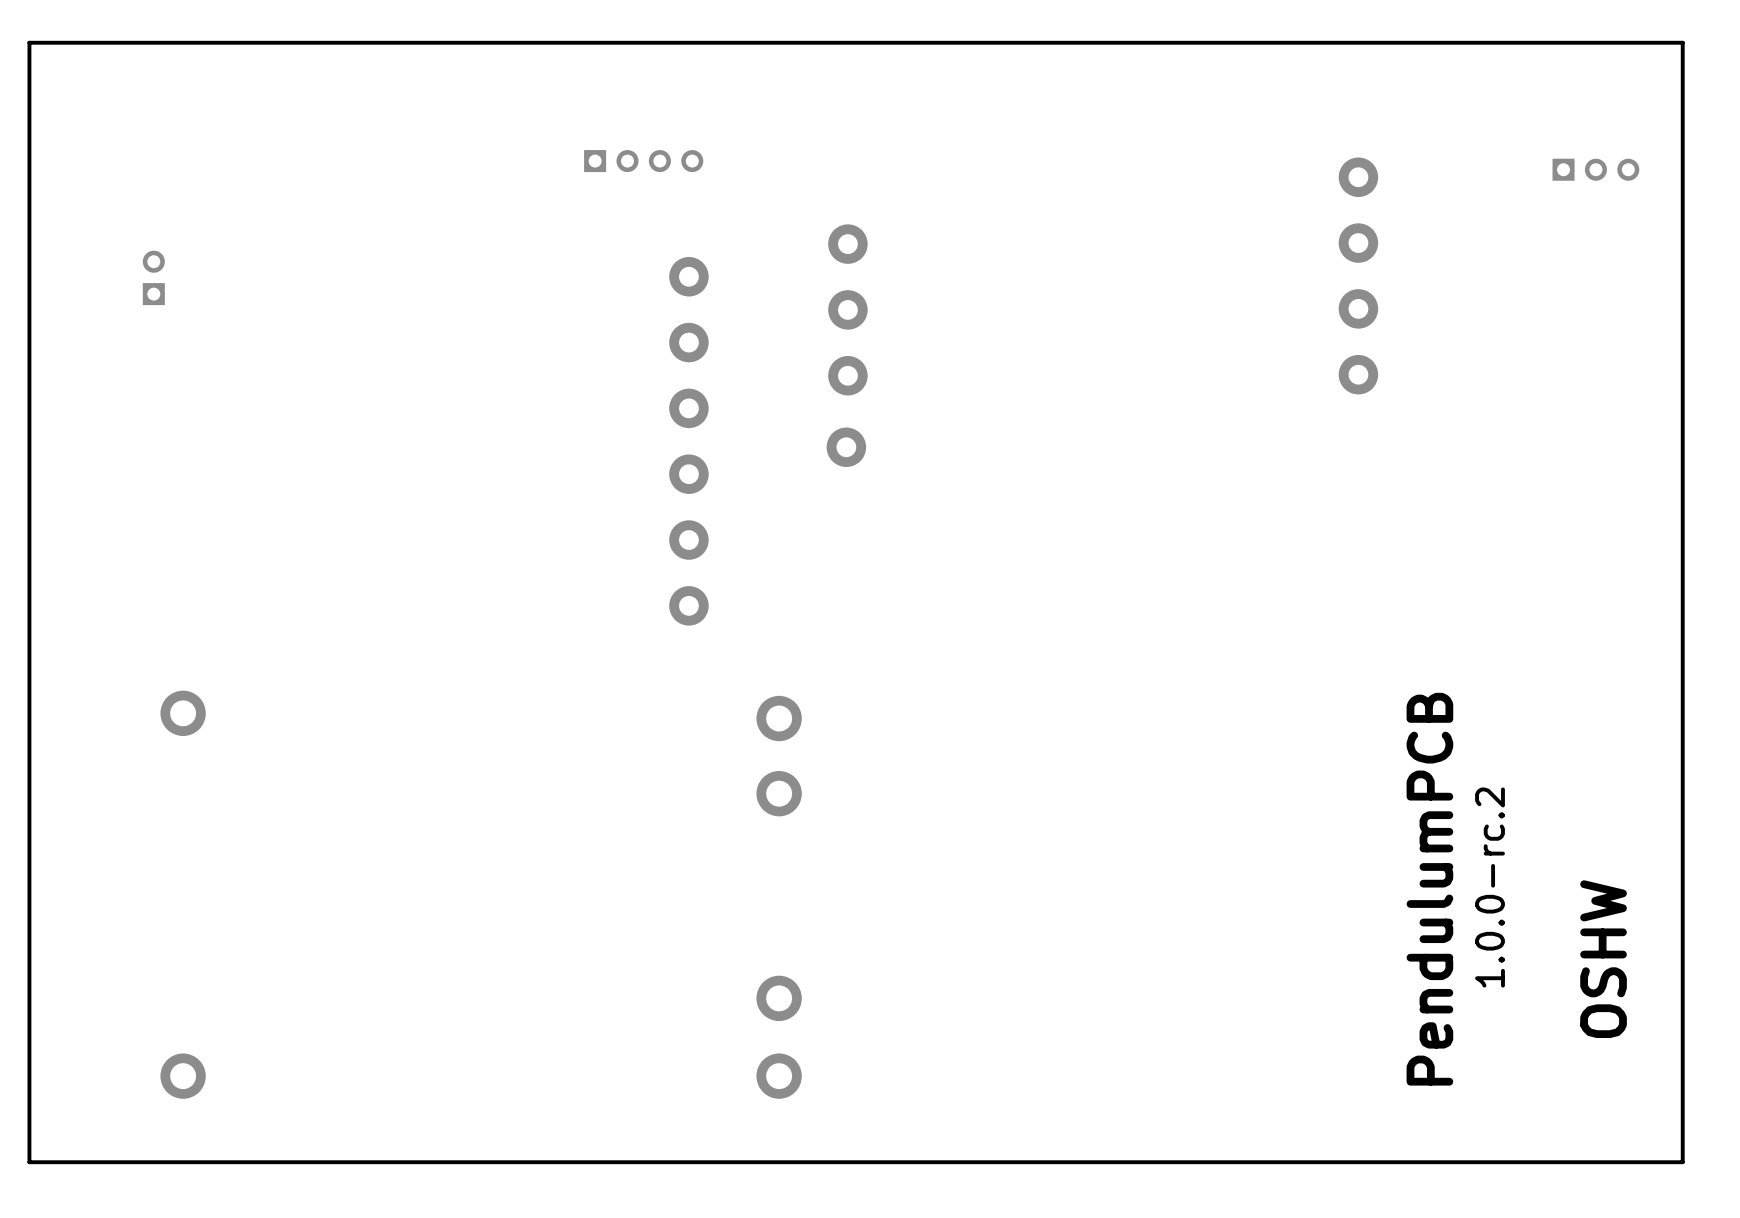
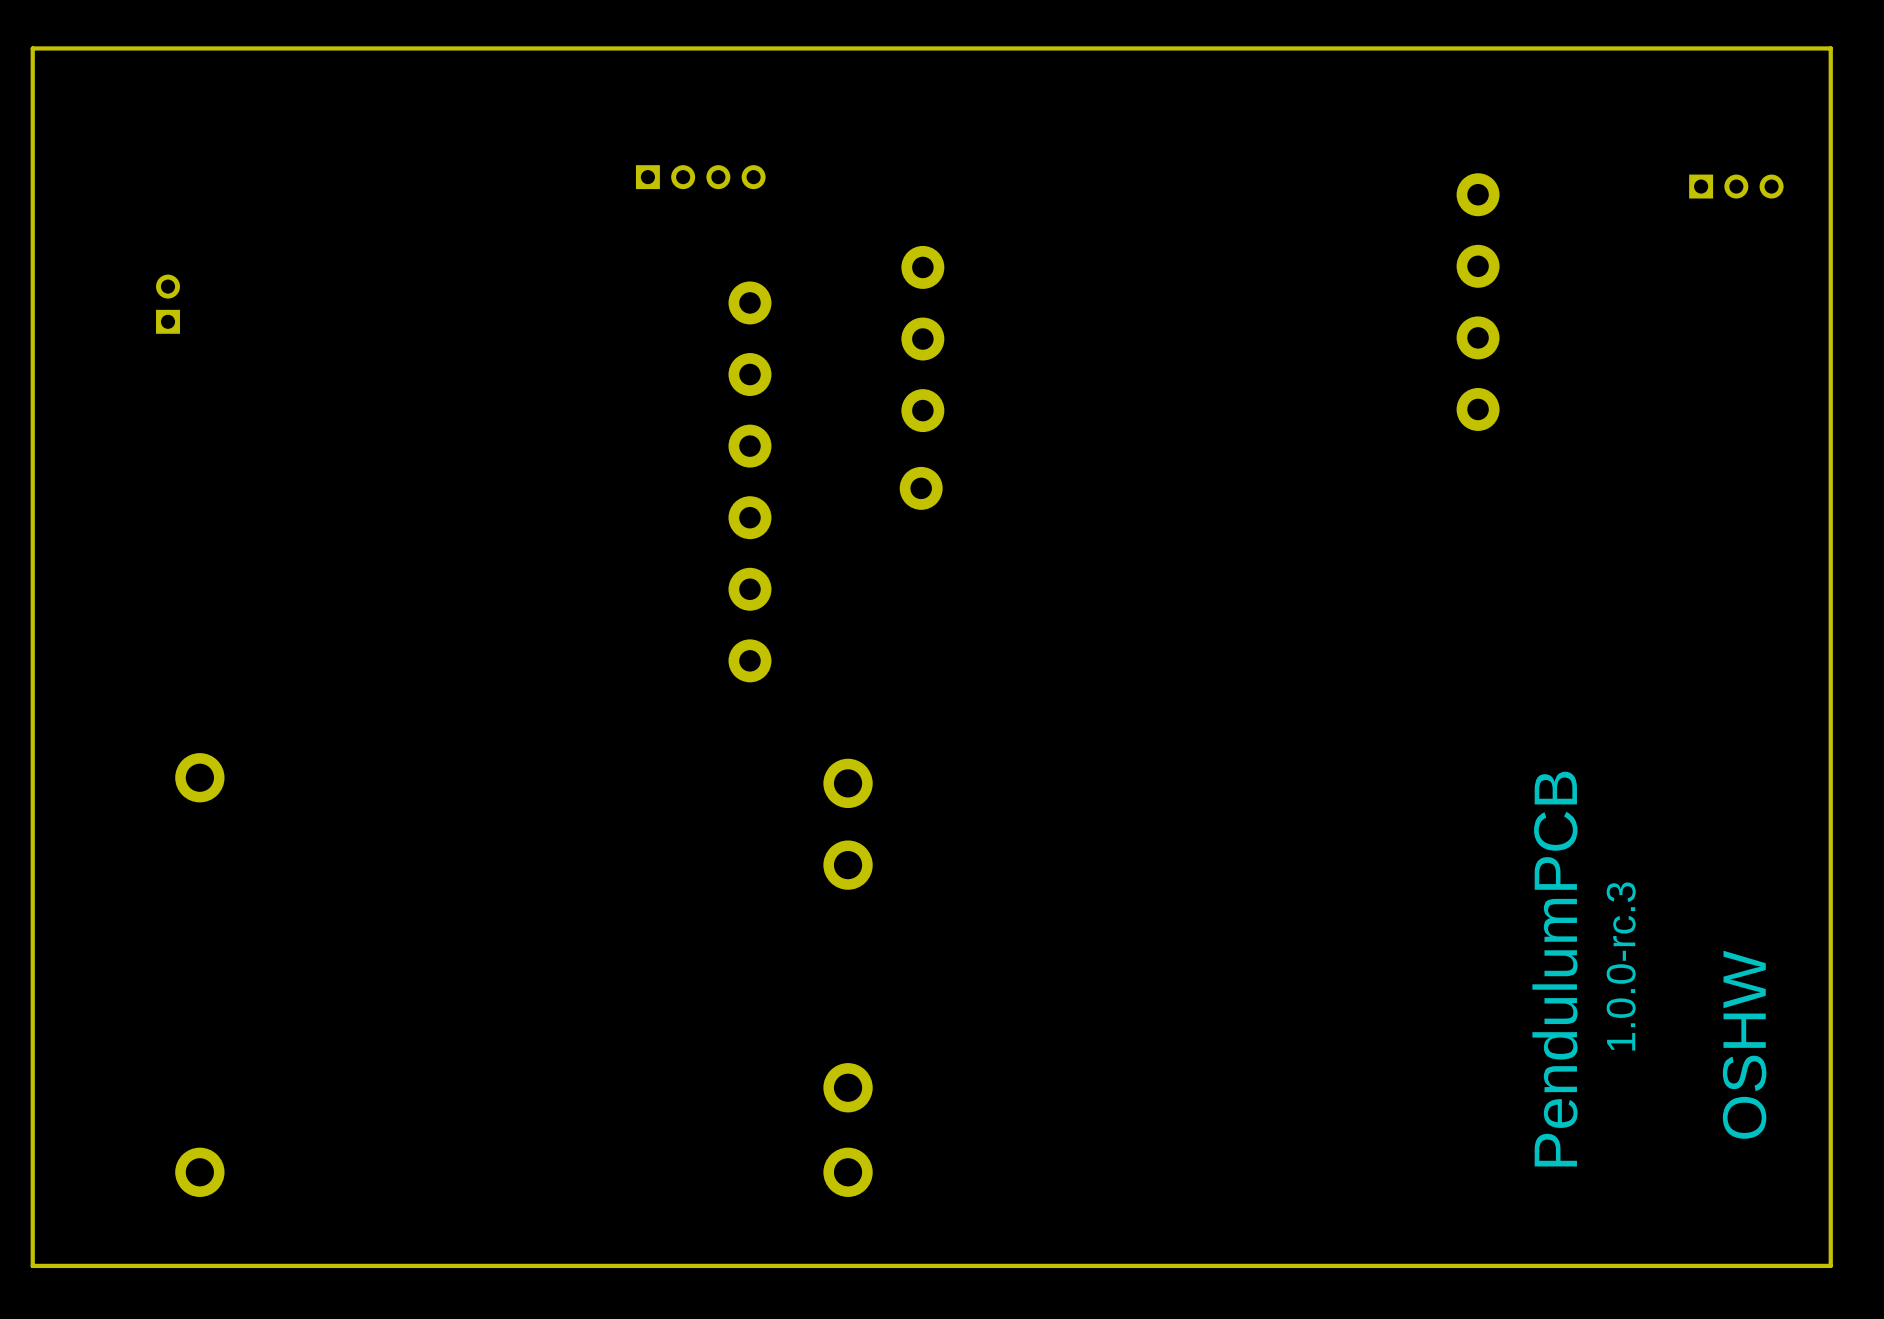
text: 1.0.0-rc.2 (1490, 887) -> 1.0.0-rc.3 (1621, 966)

